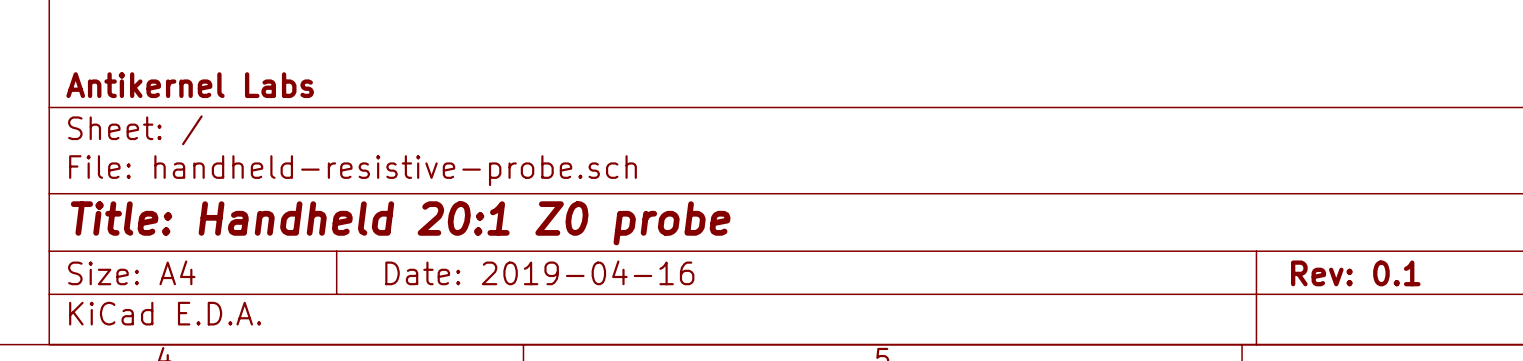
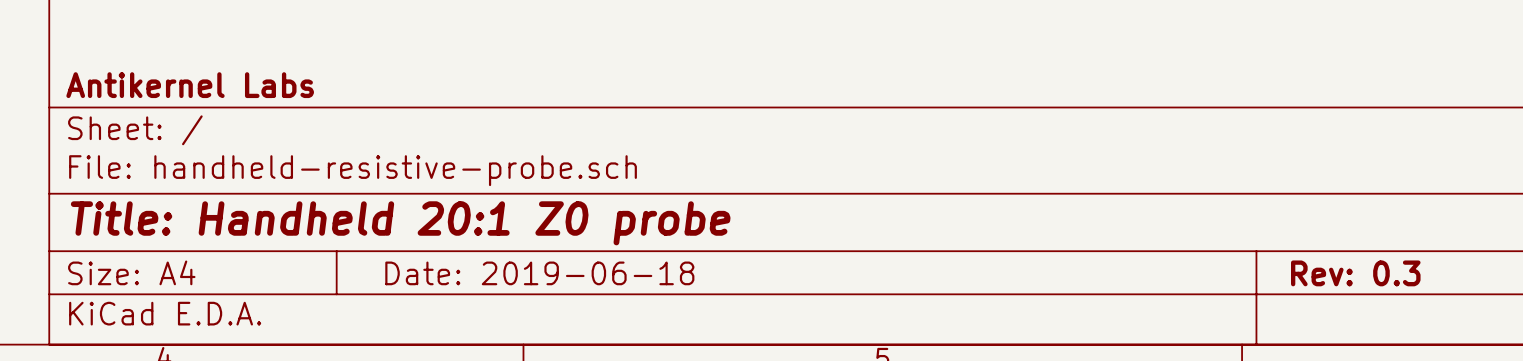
title block: Date: 2019-04-16 (539, 272) -> Date: 2019-06-18 (539, 273)
title block: Rev: 0.1 (1355, 273) -> Rev: 0.3 (1355, 273)

